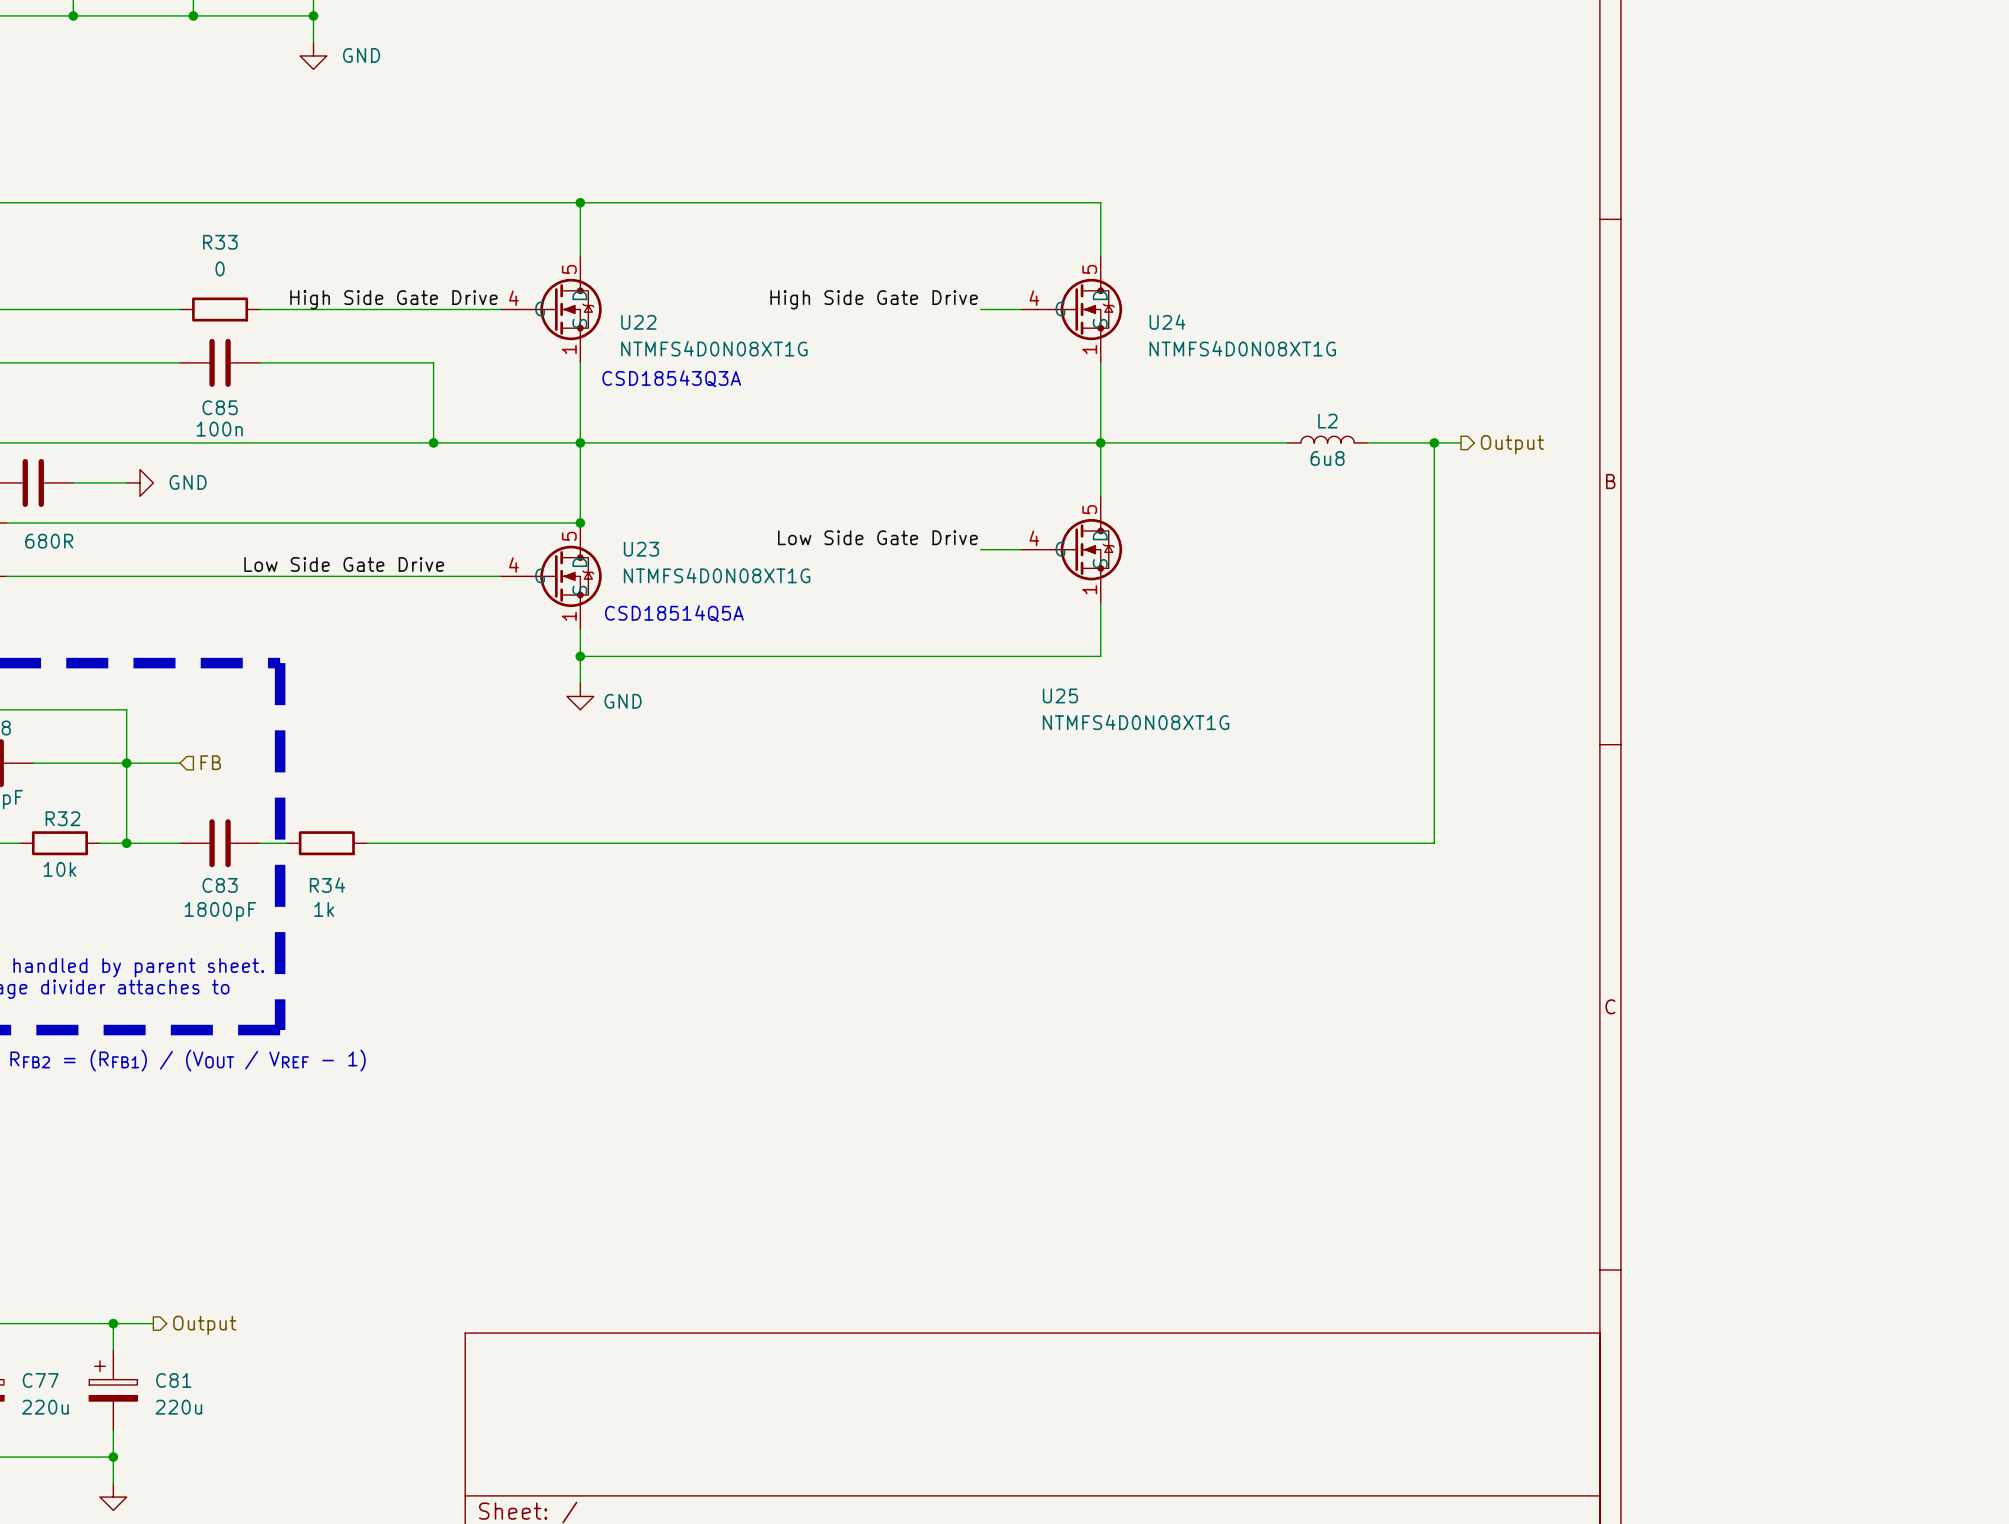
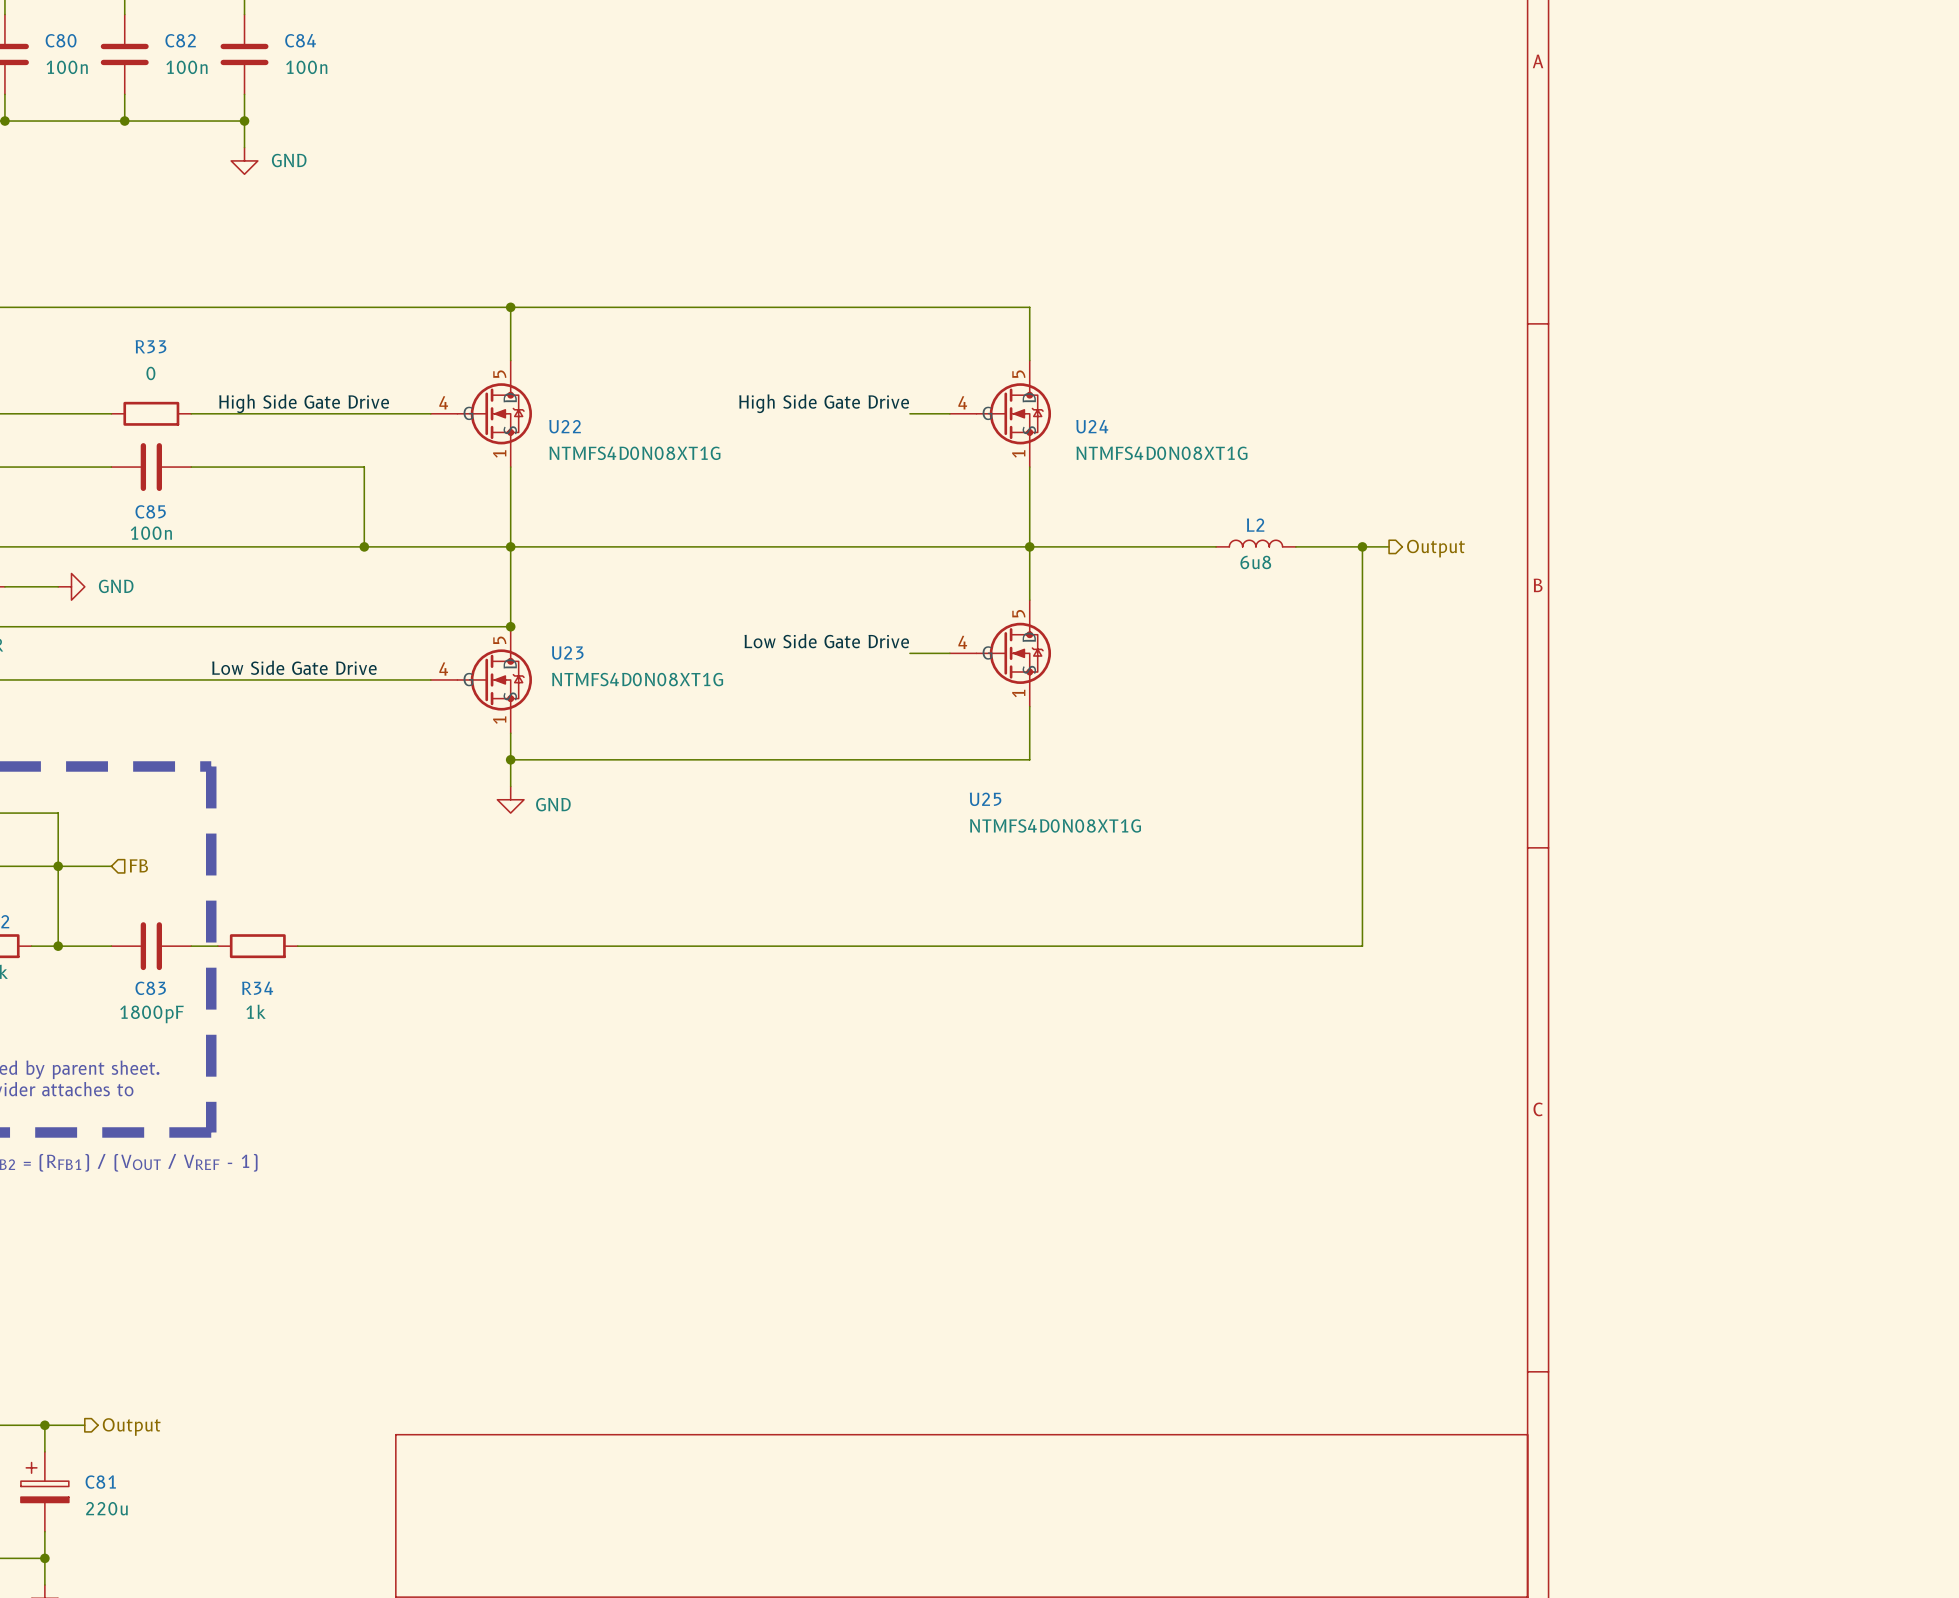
text: CSD18543Q3A (671, 378) -> none
text: CSD18514Q5A (674, 613) -> none

